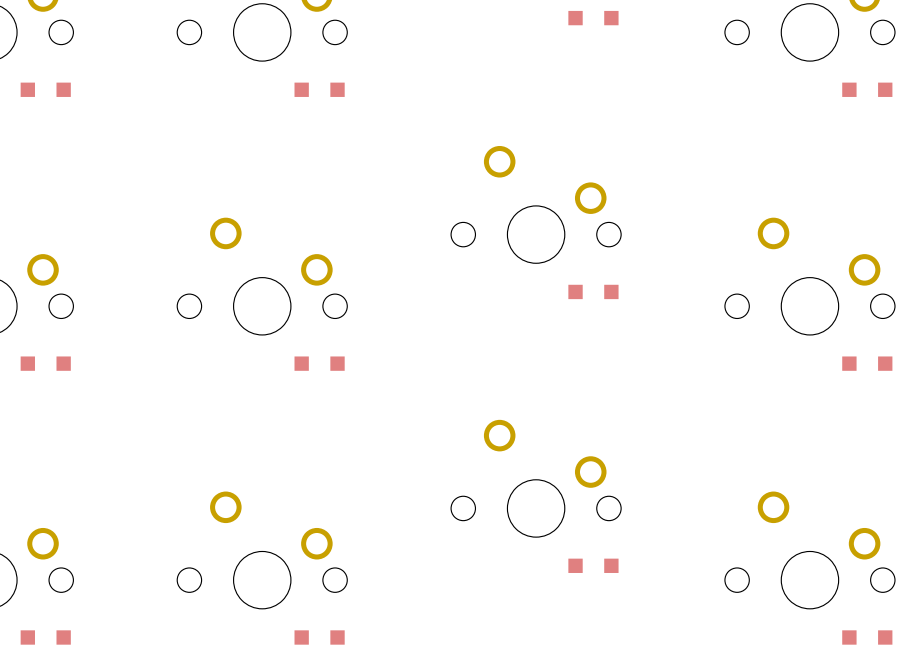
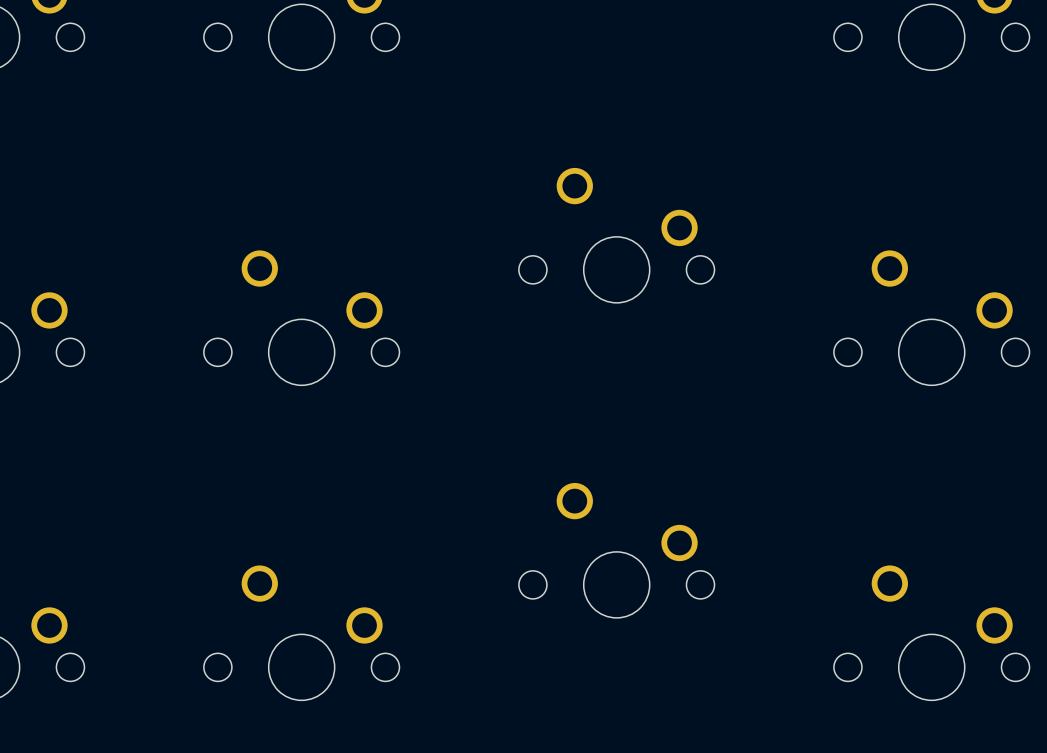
part: (593, 18) -> none
part: (45, 89) -> none
part: (319, 89) -> none
part: (867, 89) -> none
part: (593, 291) -> none
part: (45, 363) -> none
part: (319, 363) -> none
part: (867, 363) -> none
part: (593, 565) -> none
part: (45, 637) -> none
part: (319, 637) -> none
part: (867, 637) -> none

